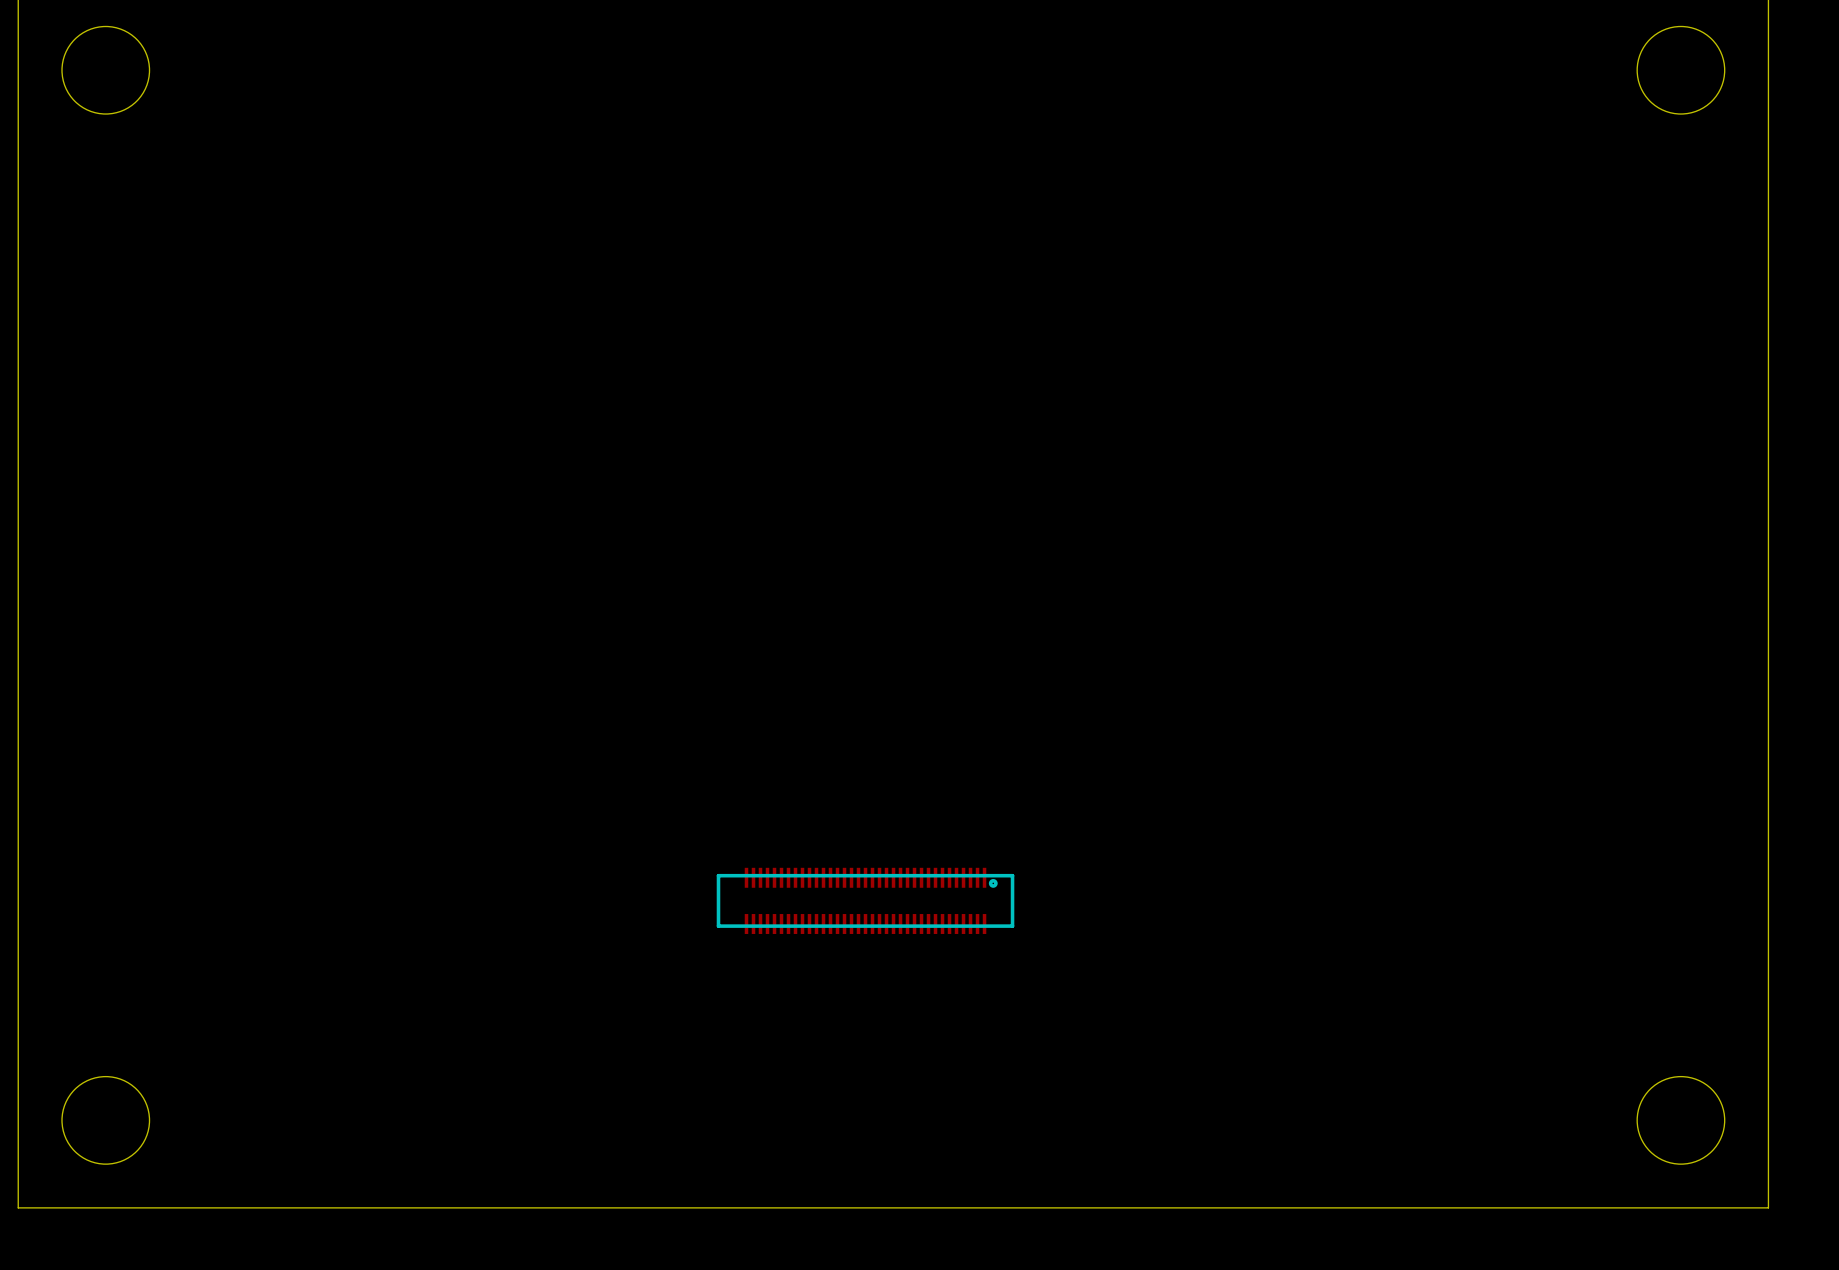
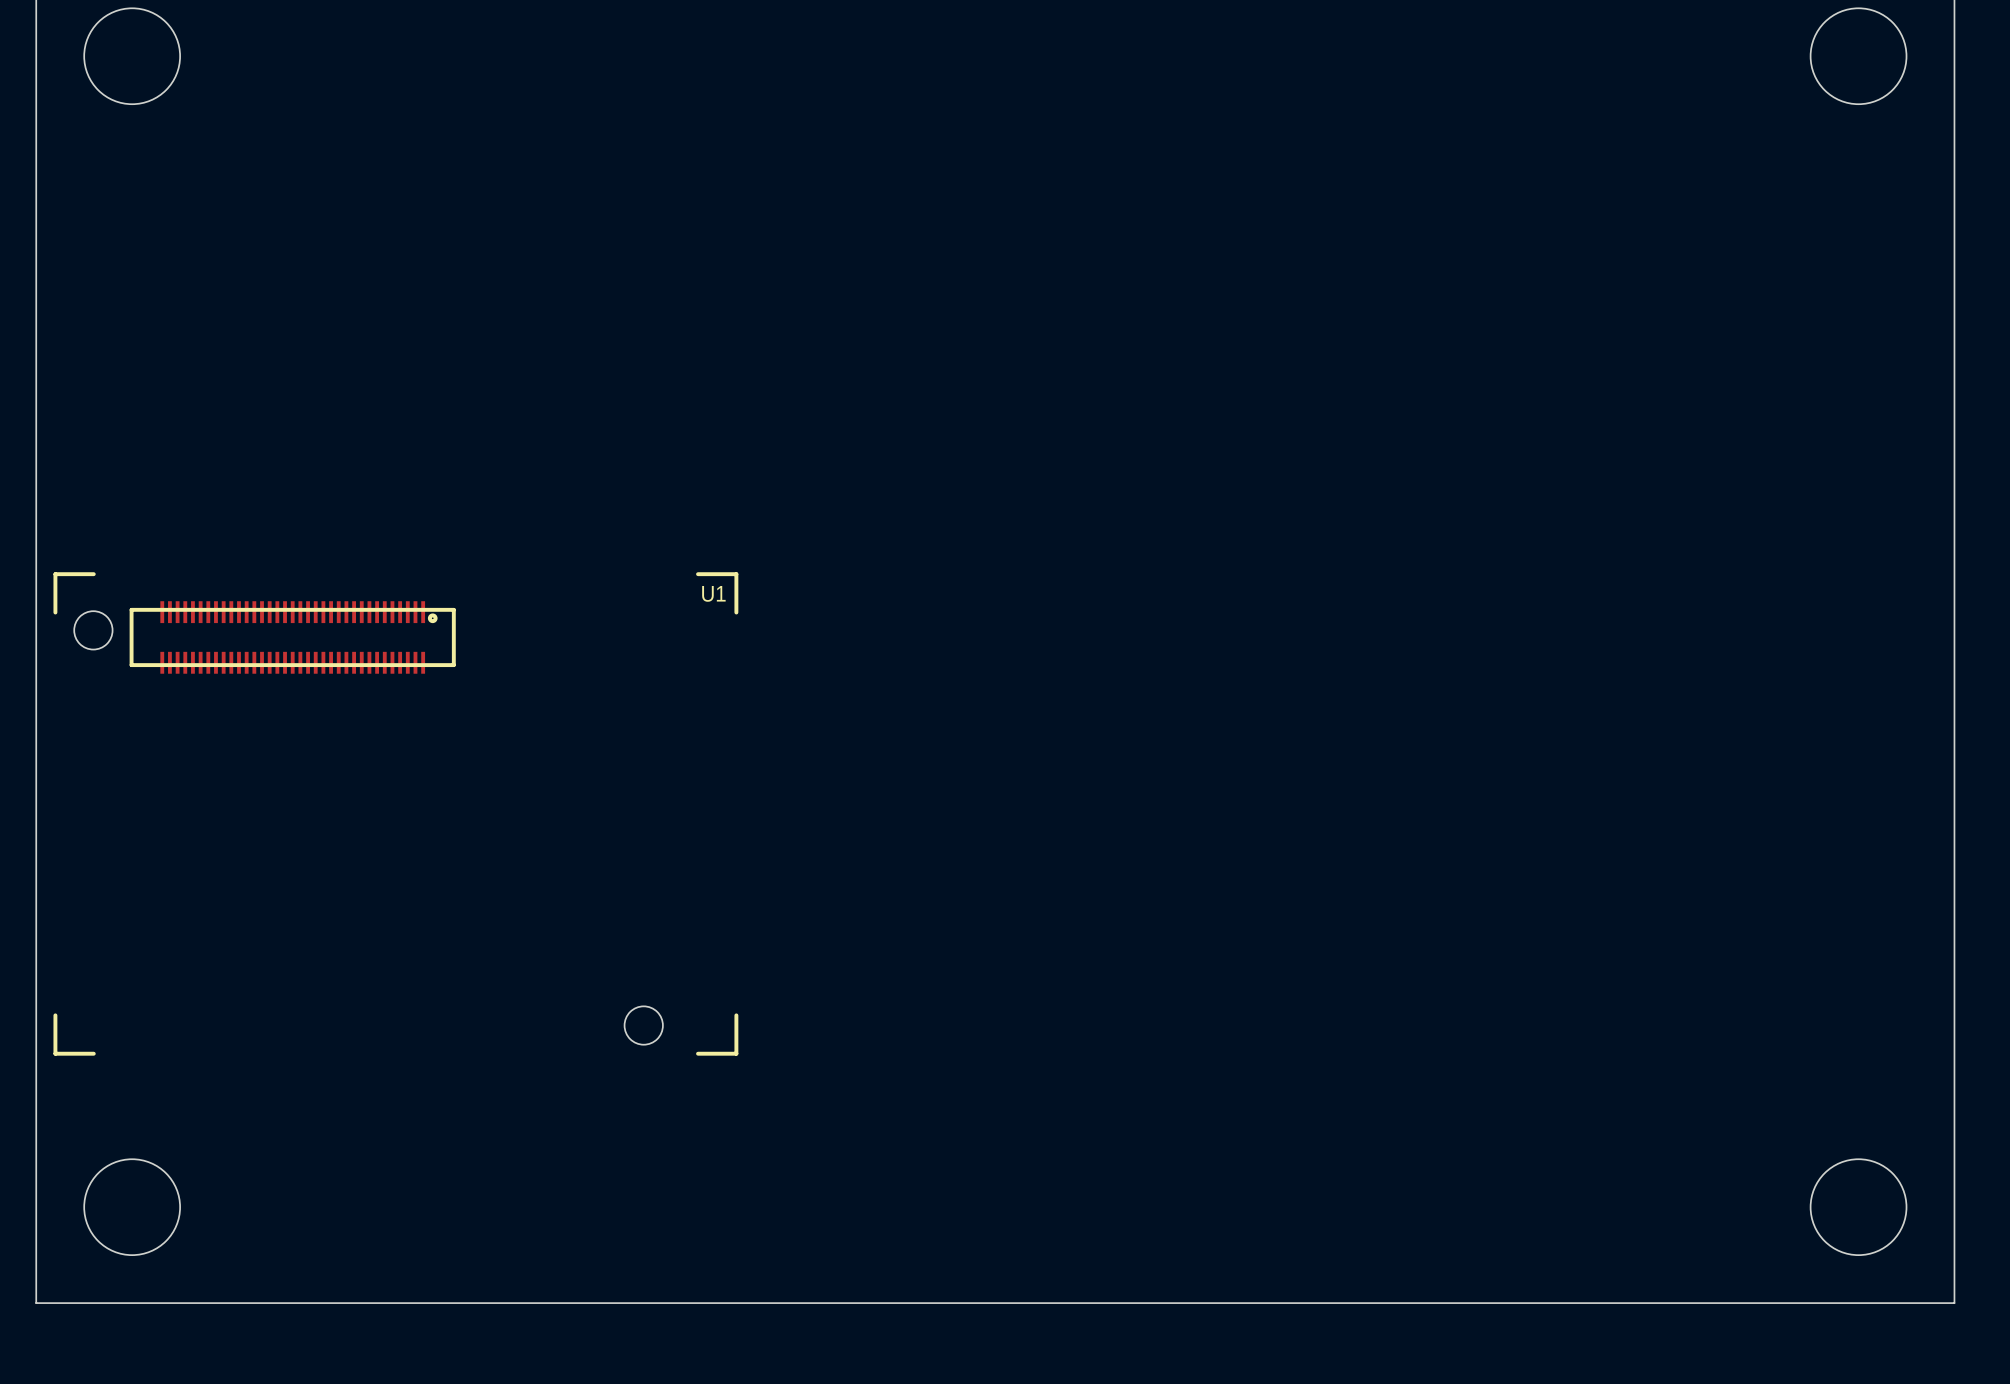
U1: none -> (395, 813)
part: (865, 900) -> none

